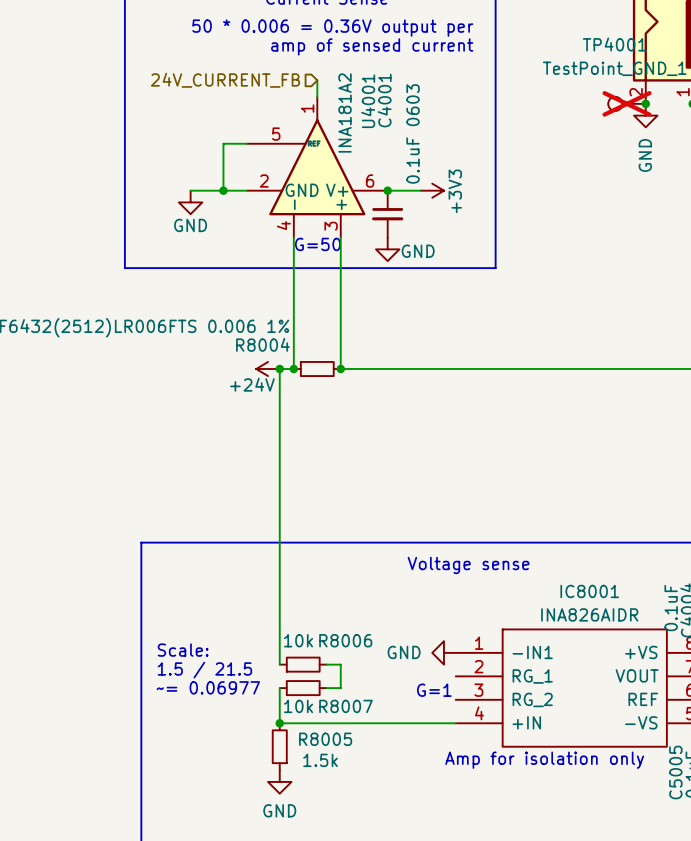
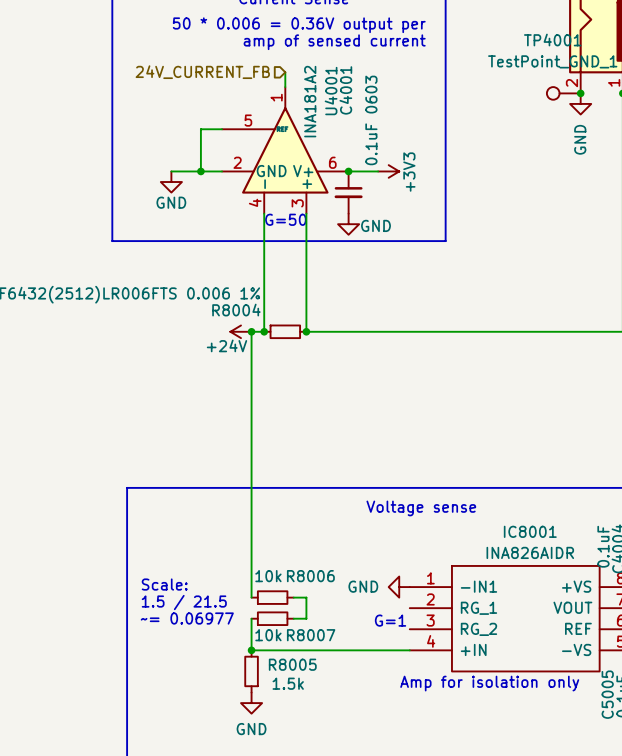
TP4001 do-not-place cross: (627, 103) -> none

